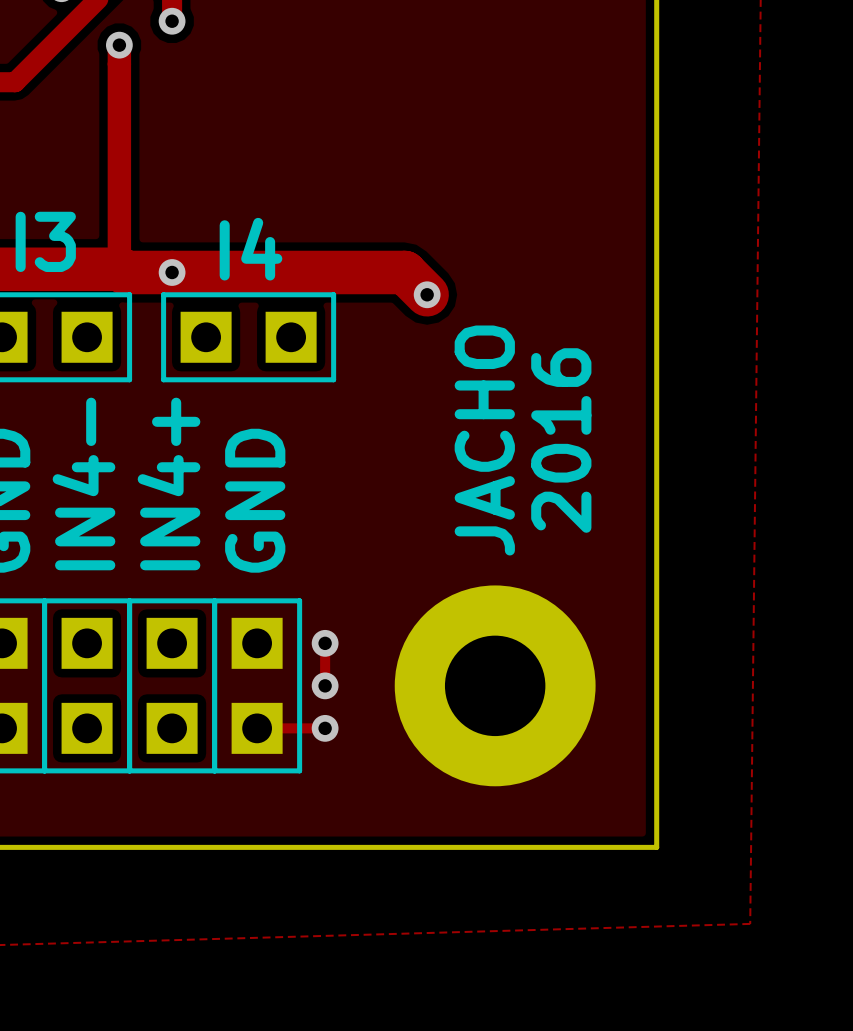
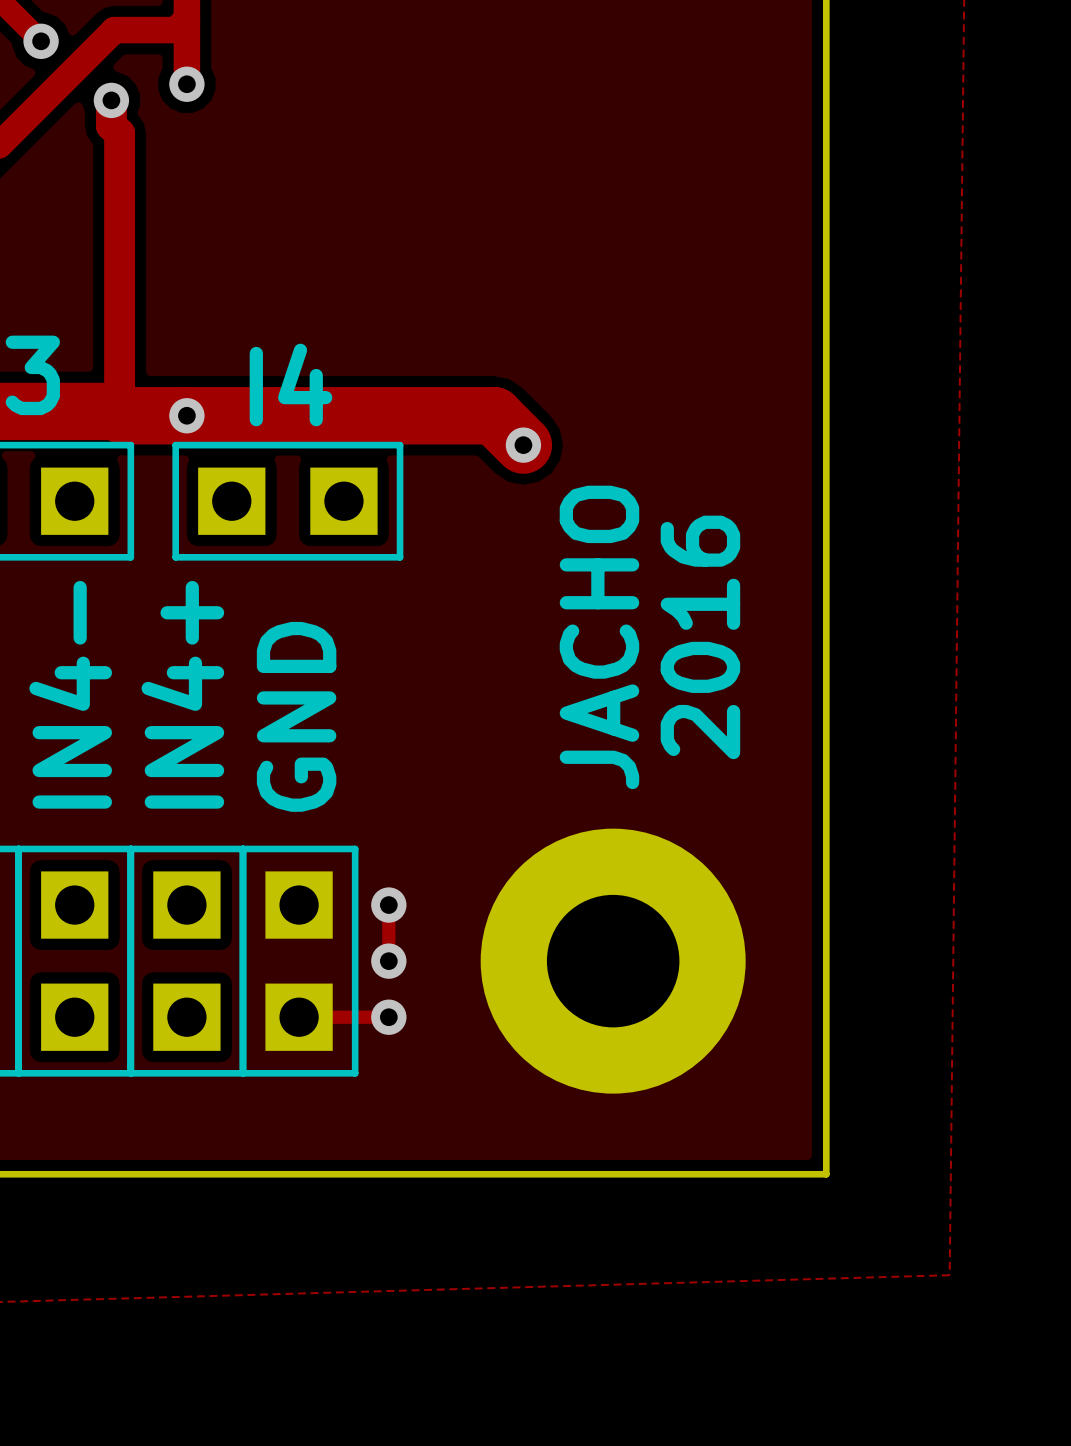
track: (119, 45) (119, 267) (121, 269) -> (111, 100) (111, 125) (119, 133) (119, 411)
via position: (119, 45) -> (111, 100)

